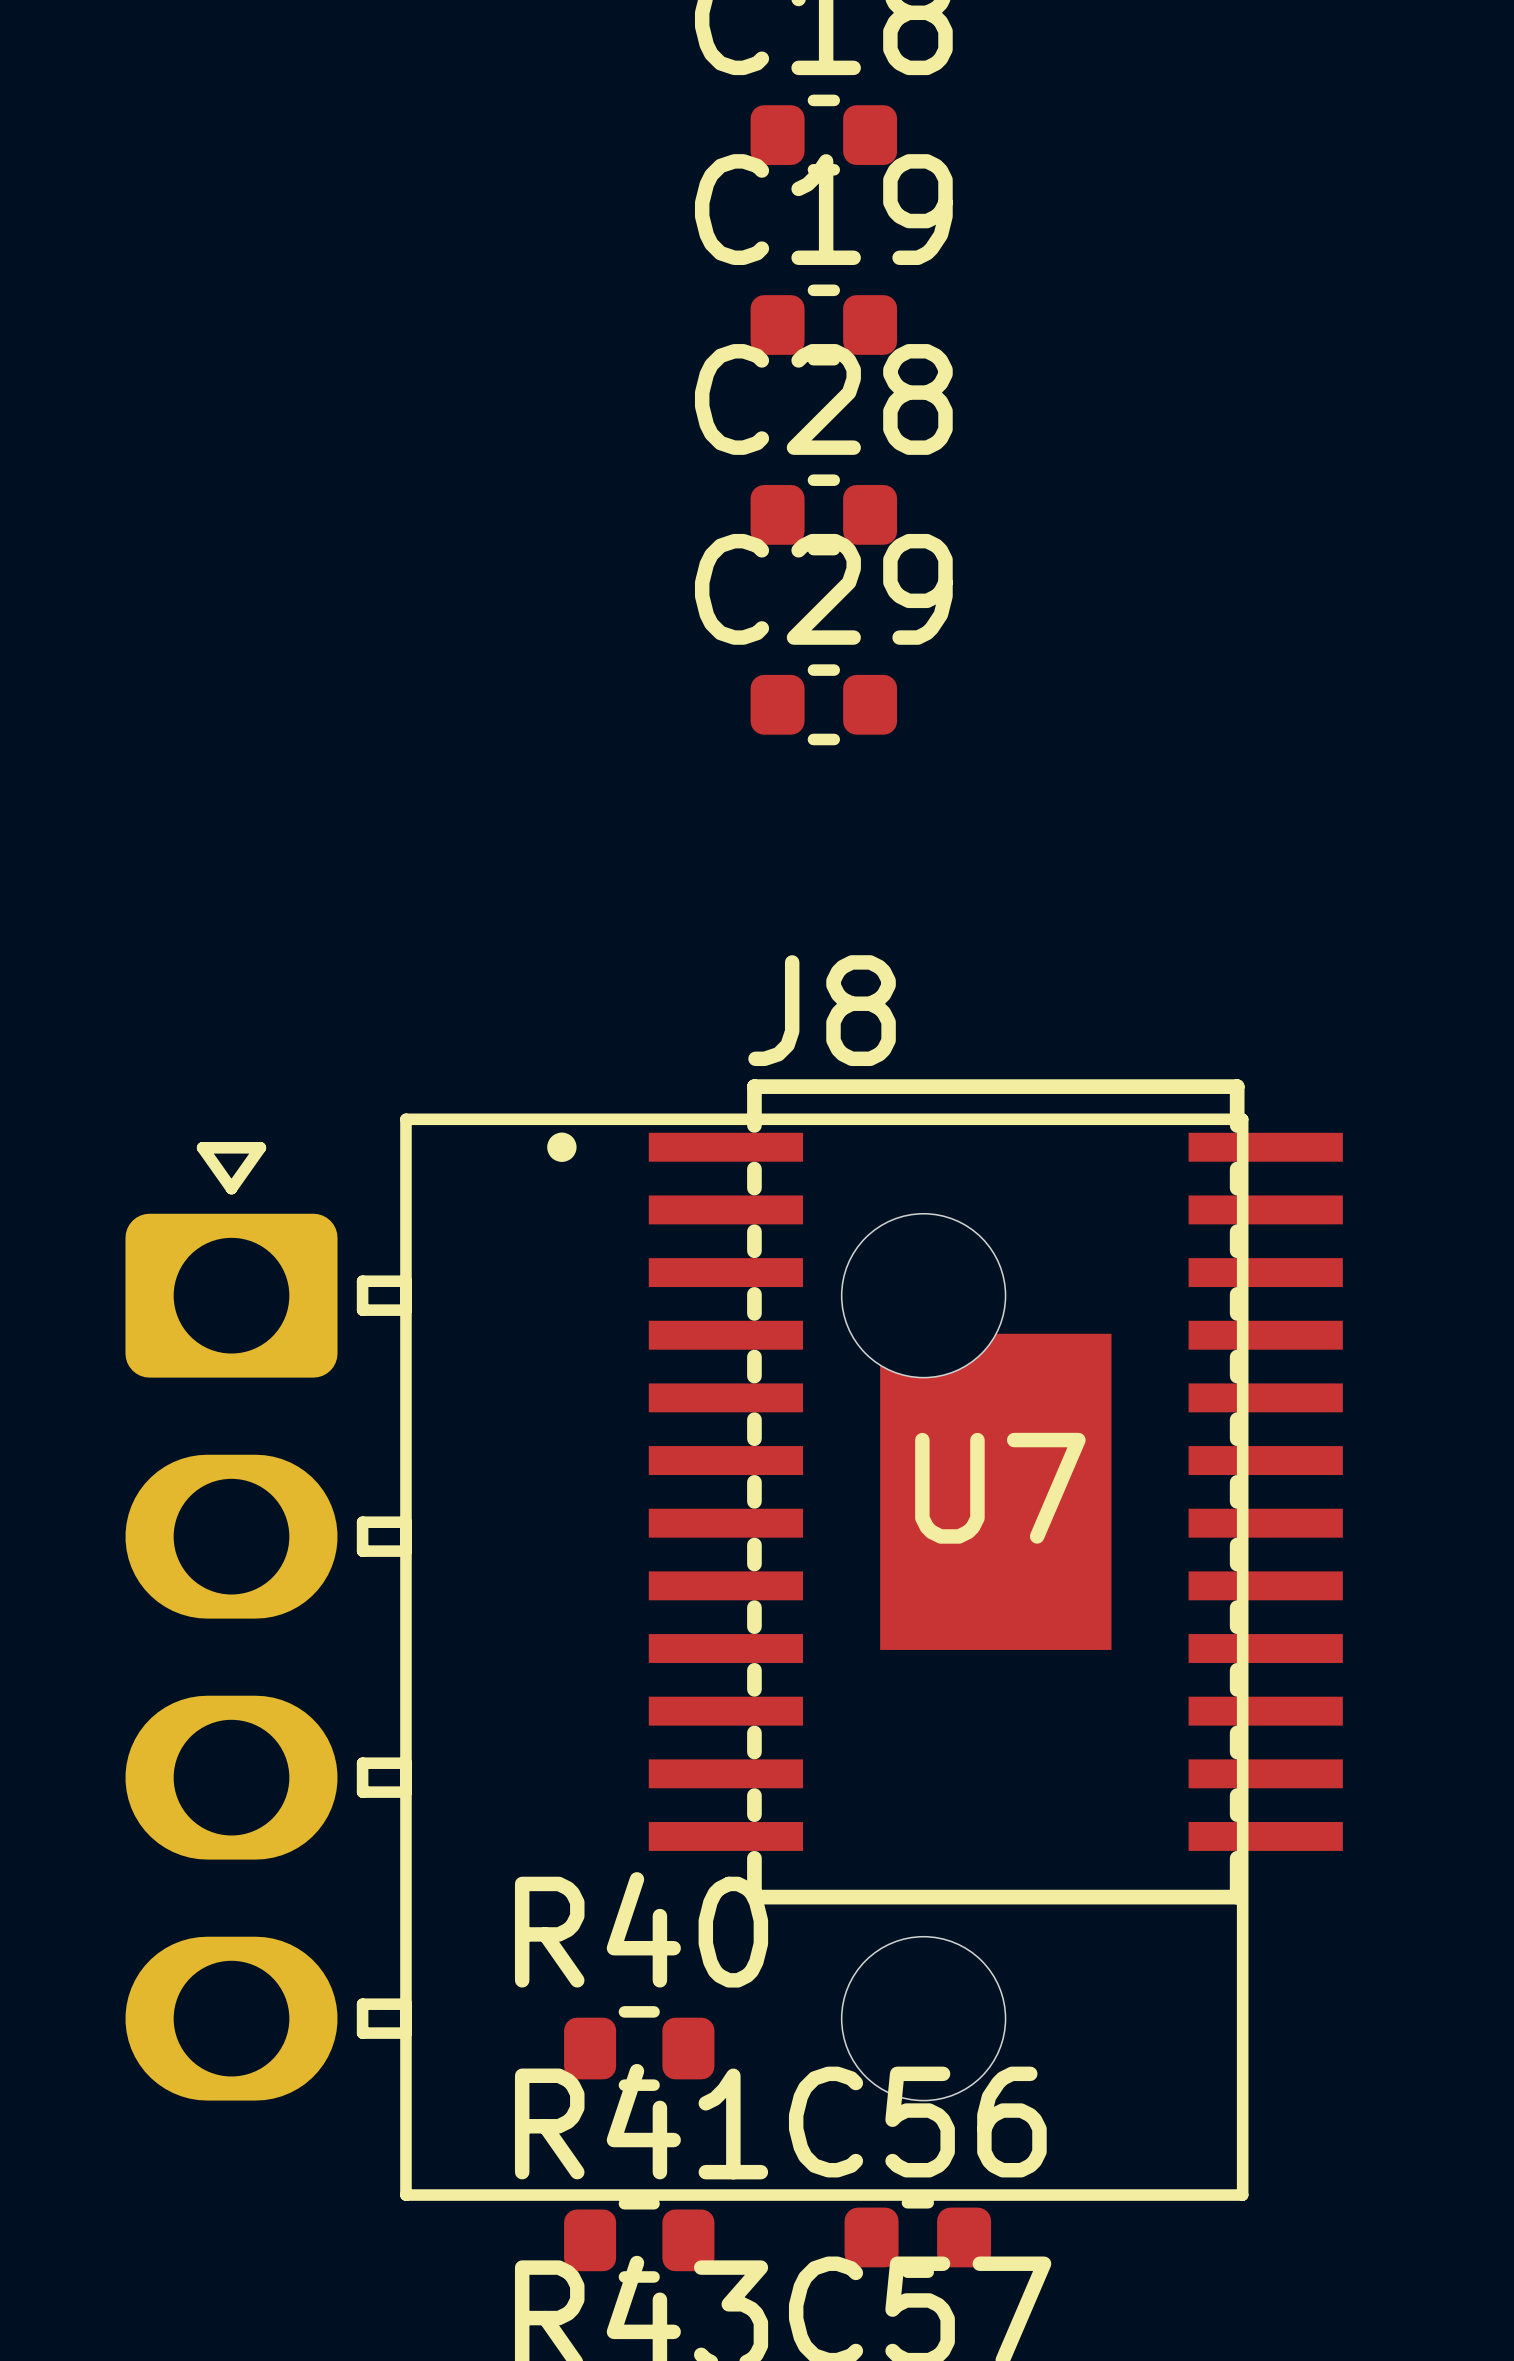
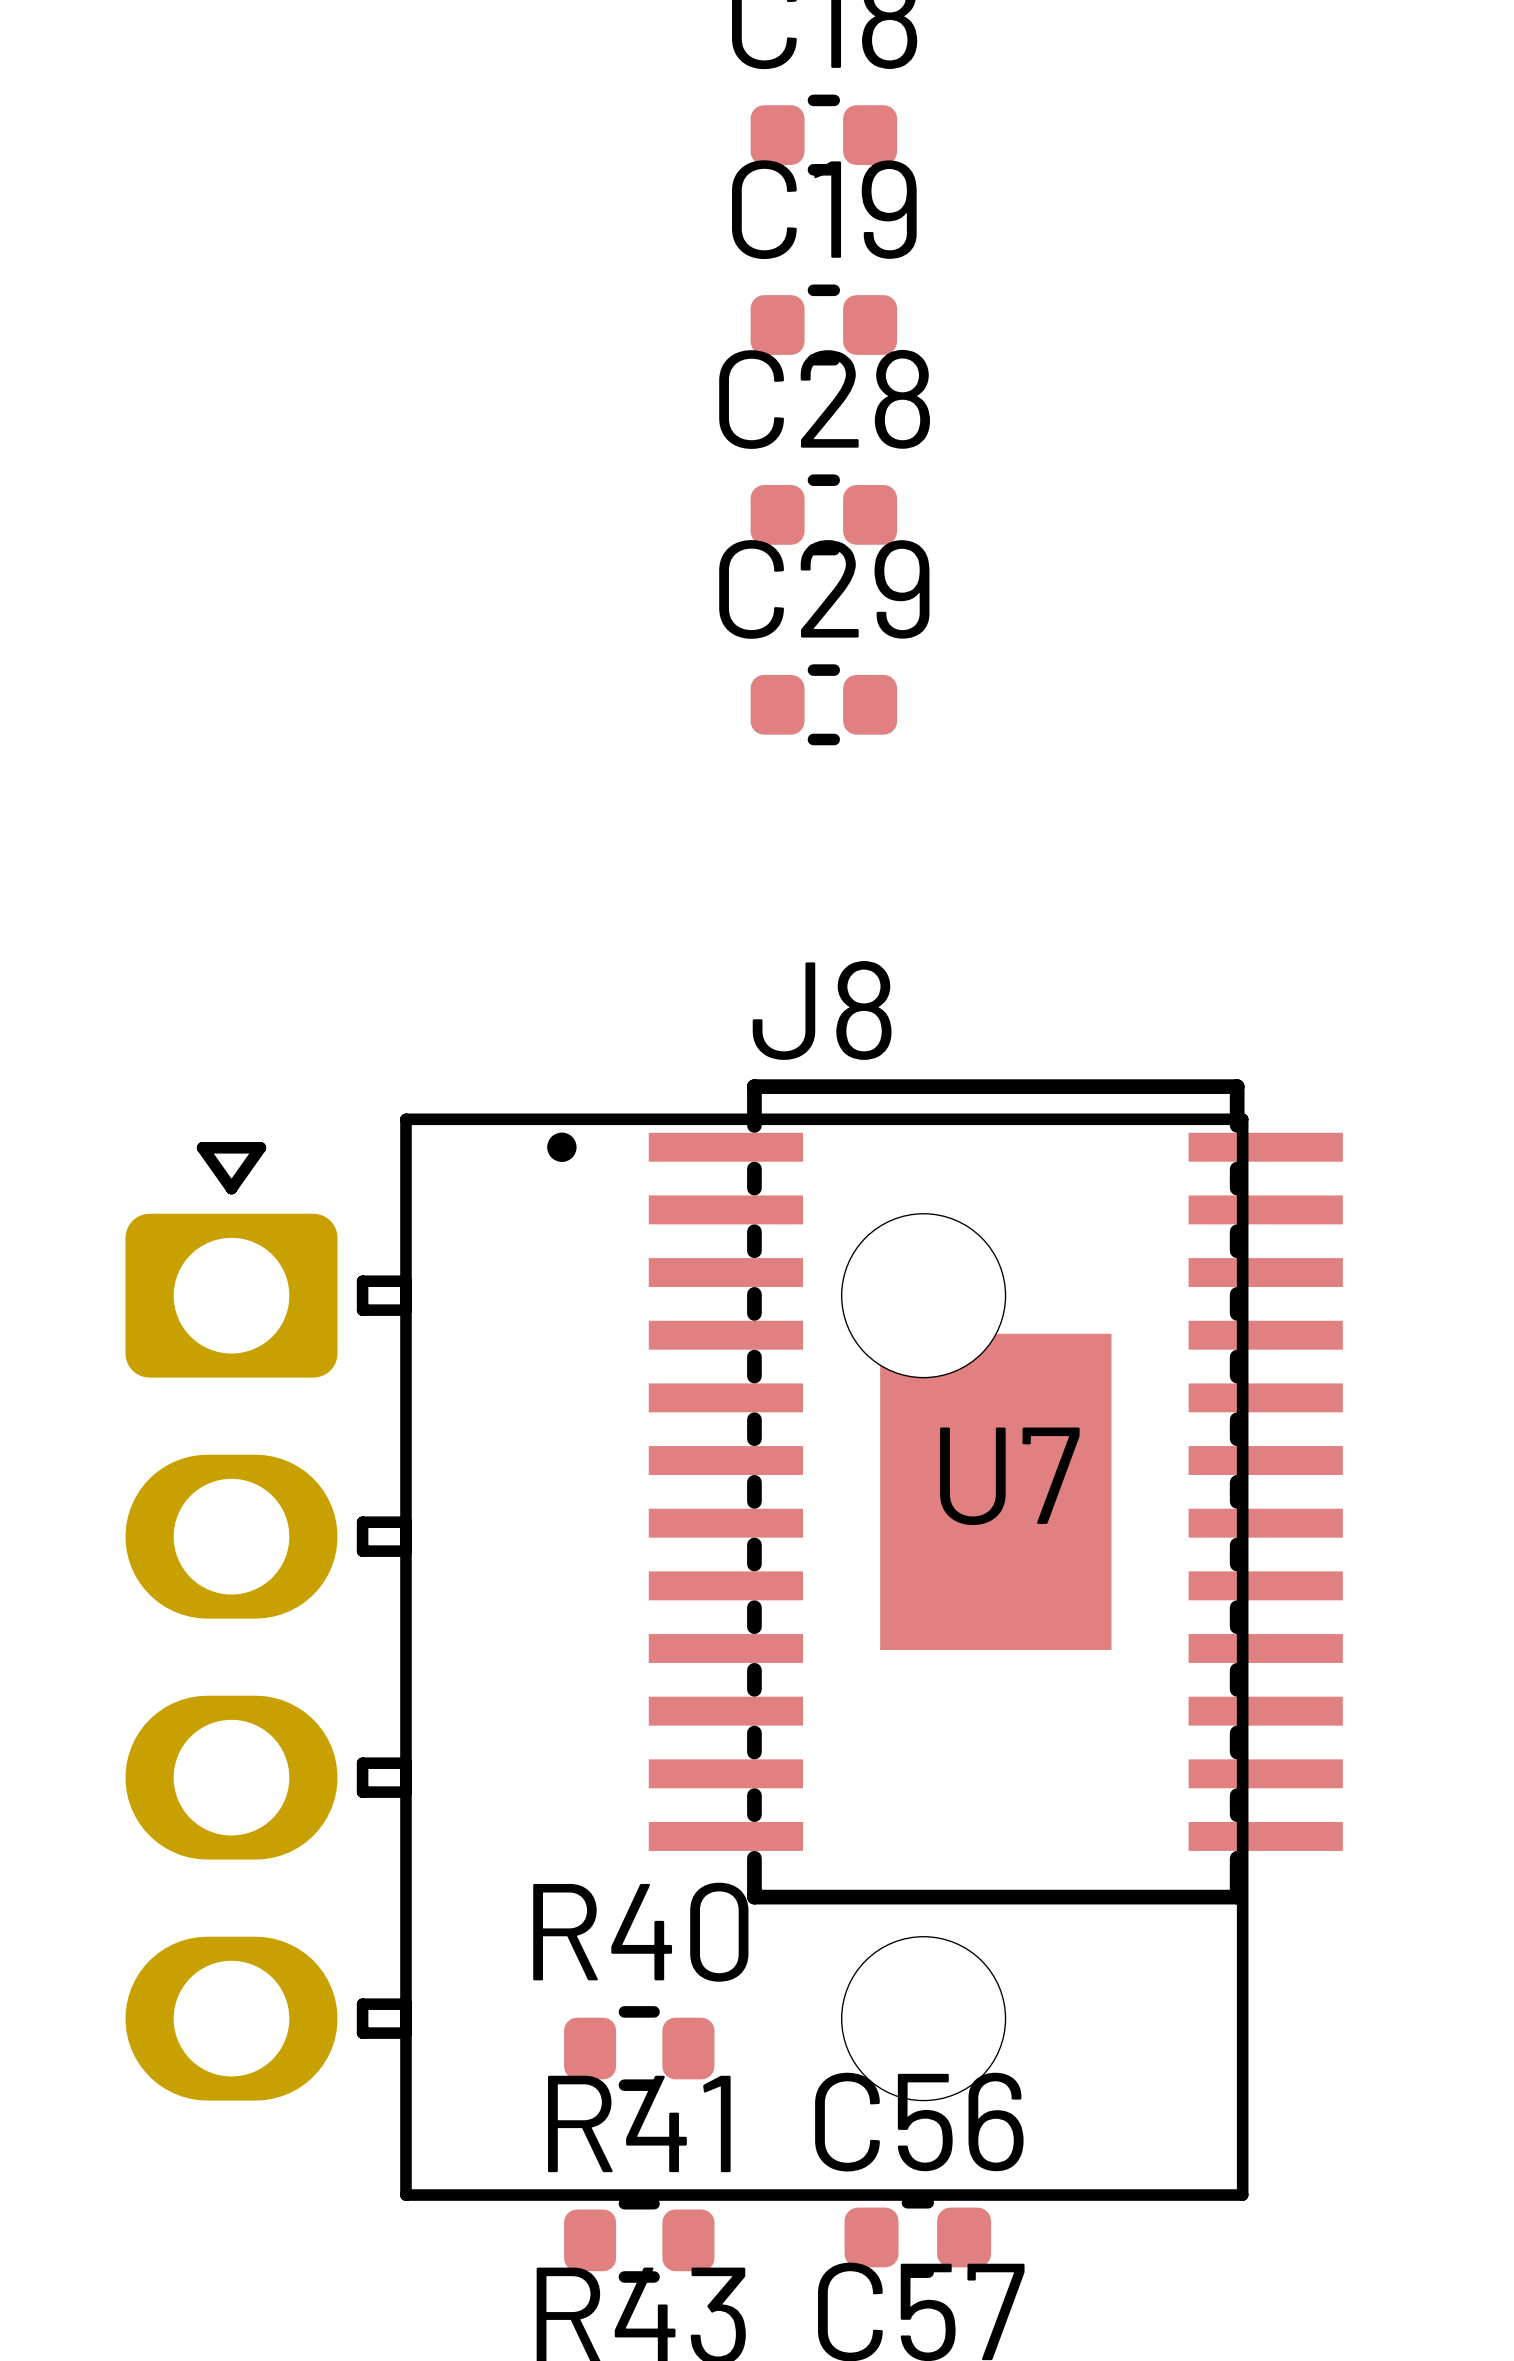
U7 name position: U7 (1000, 1488) -> U7 (1009, 1476)

